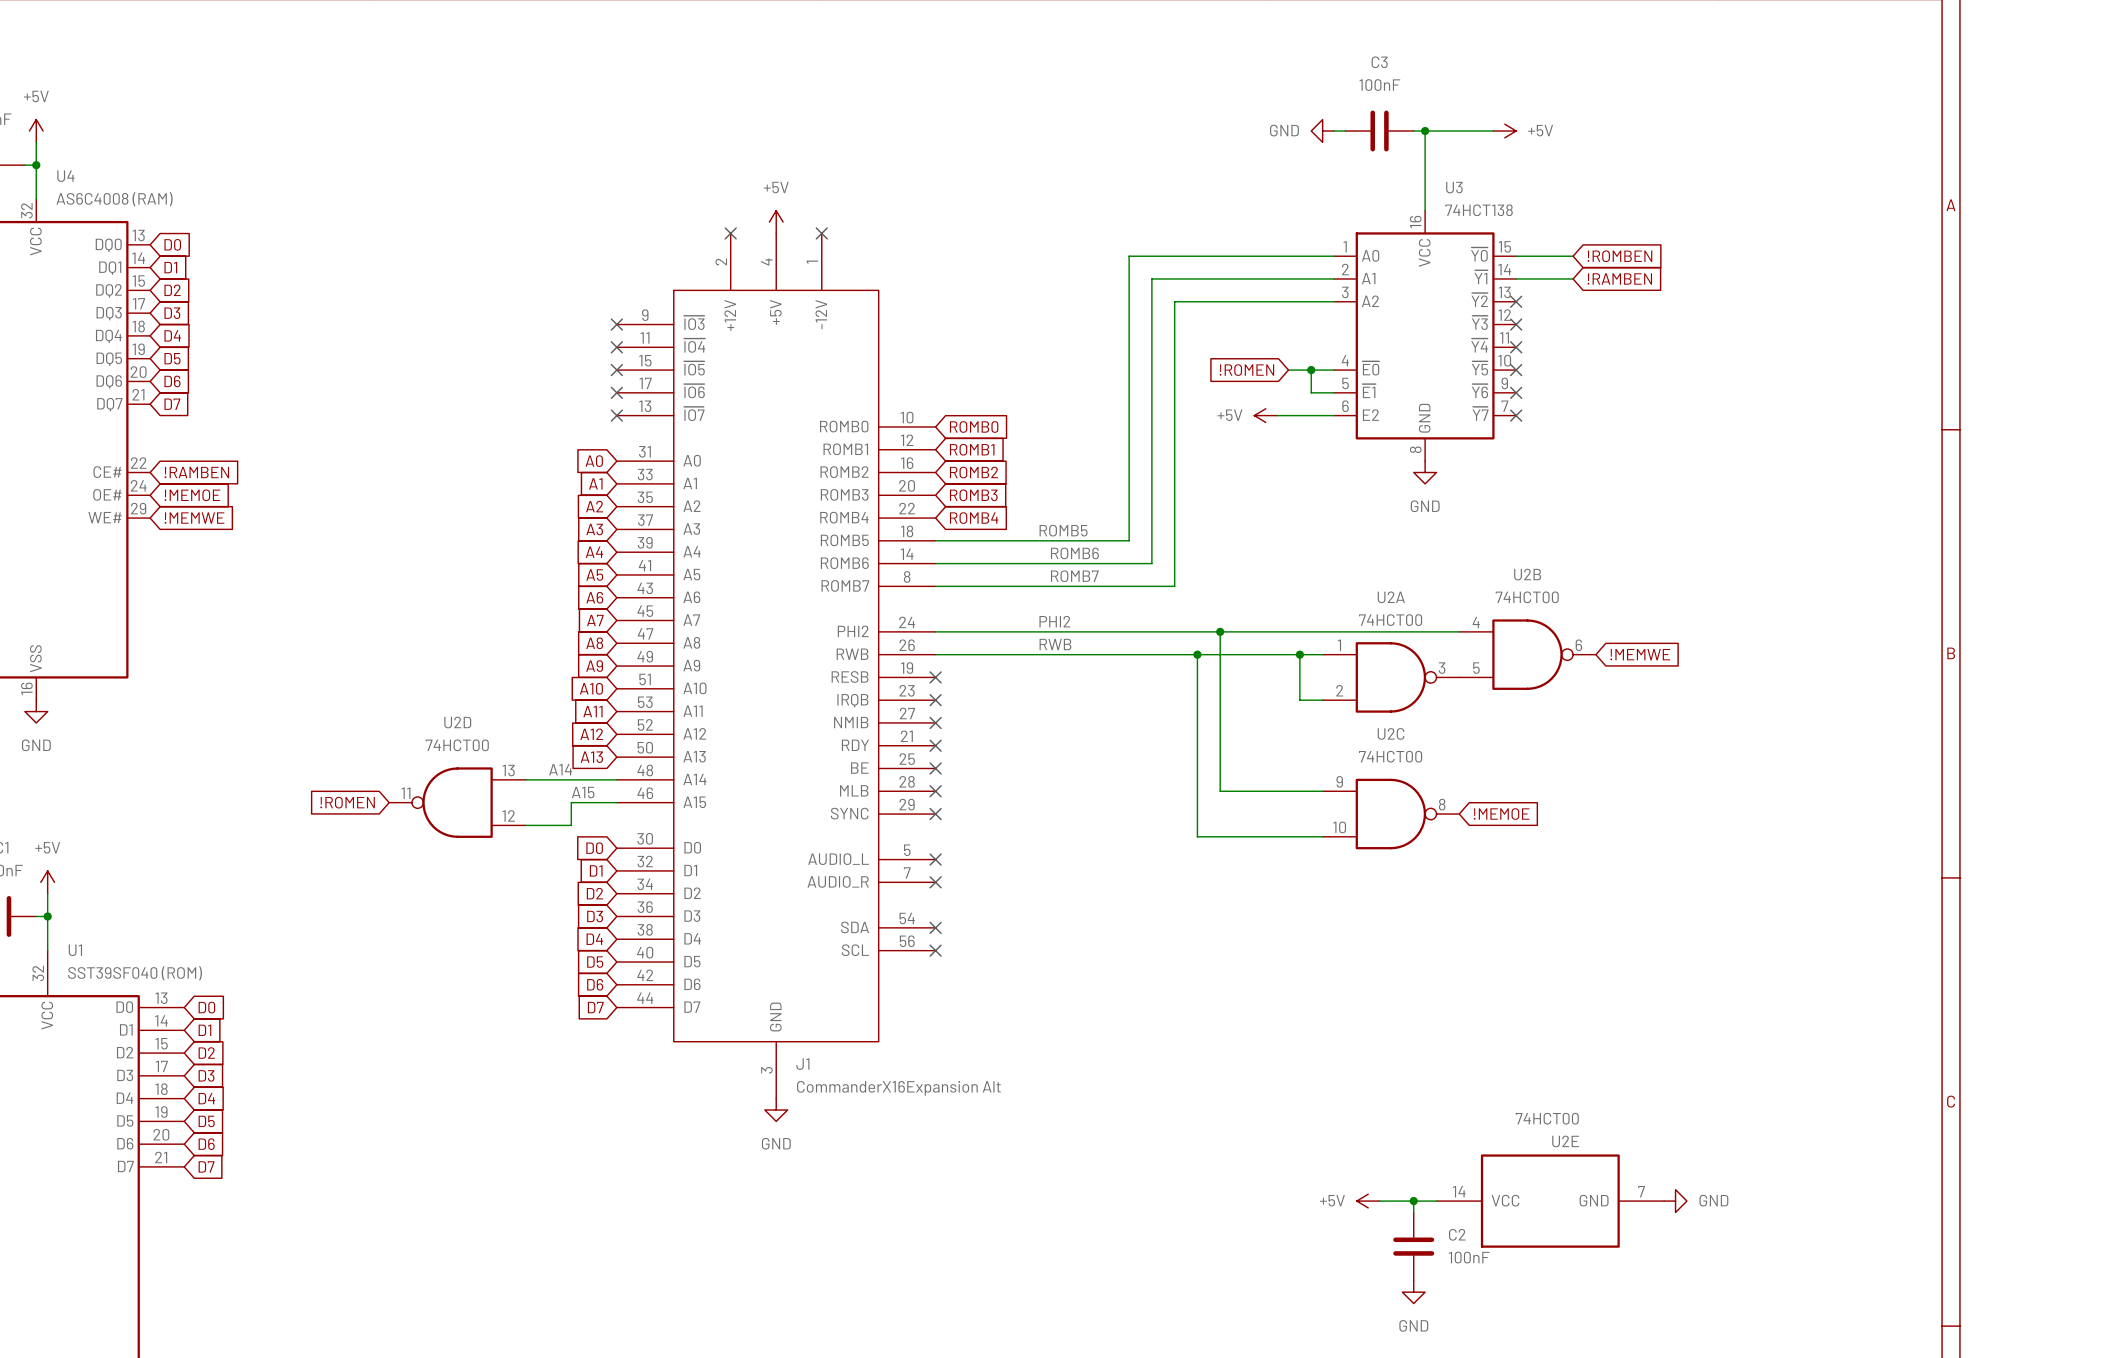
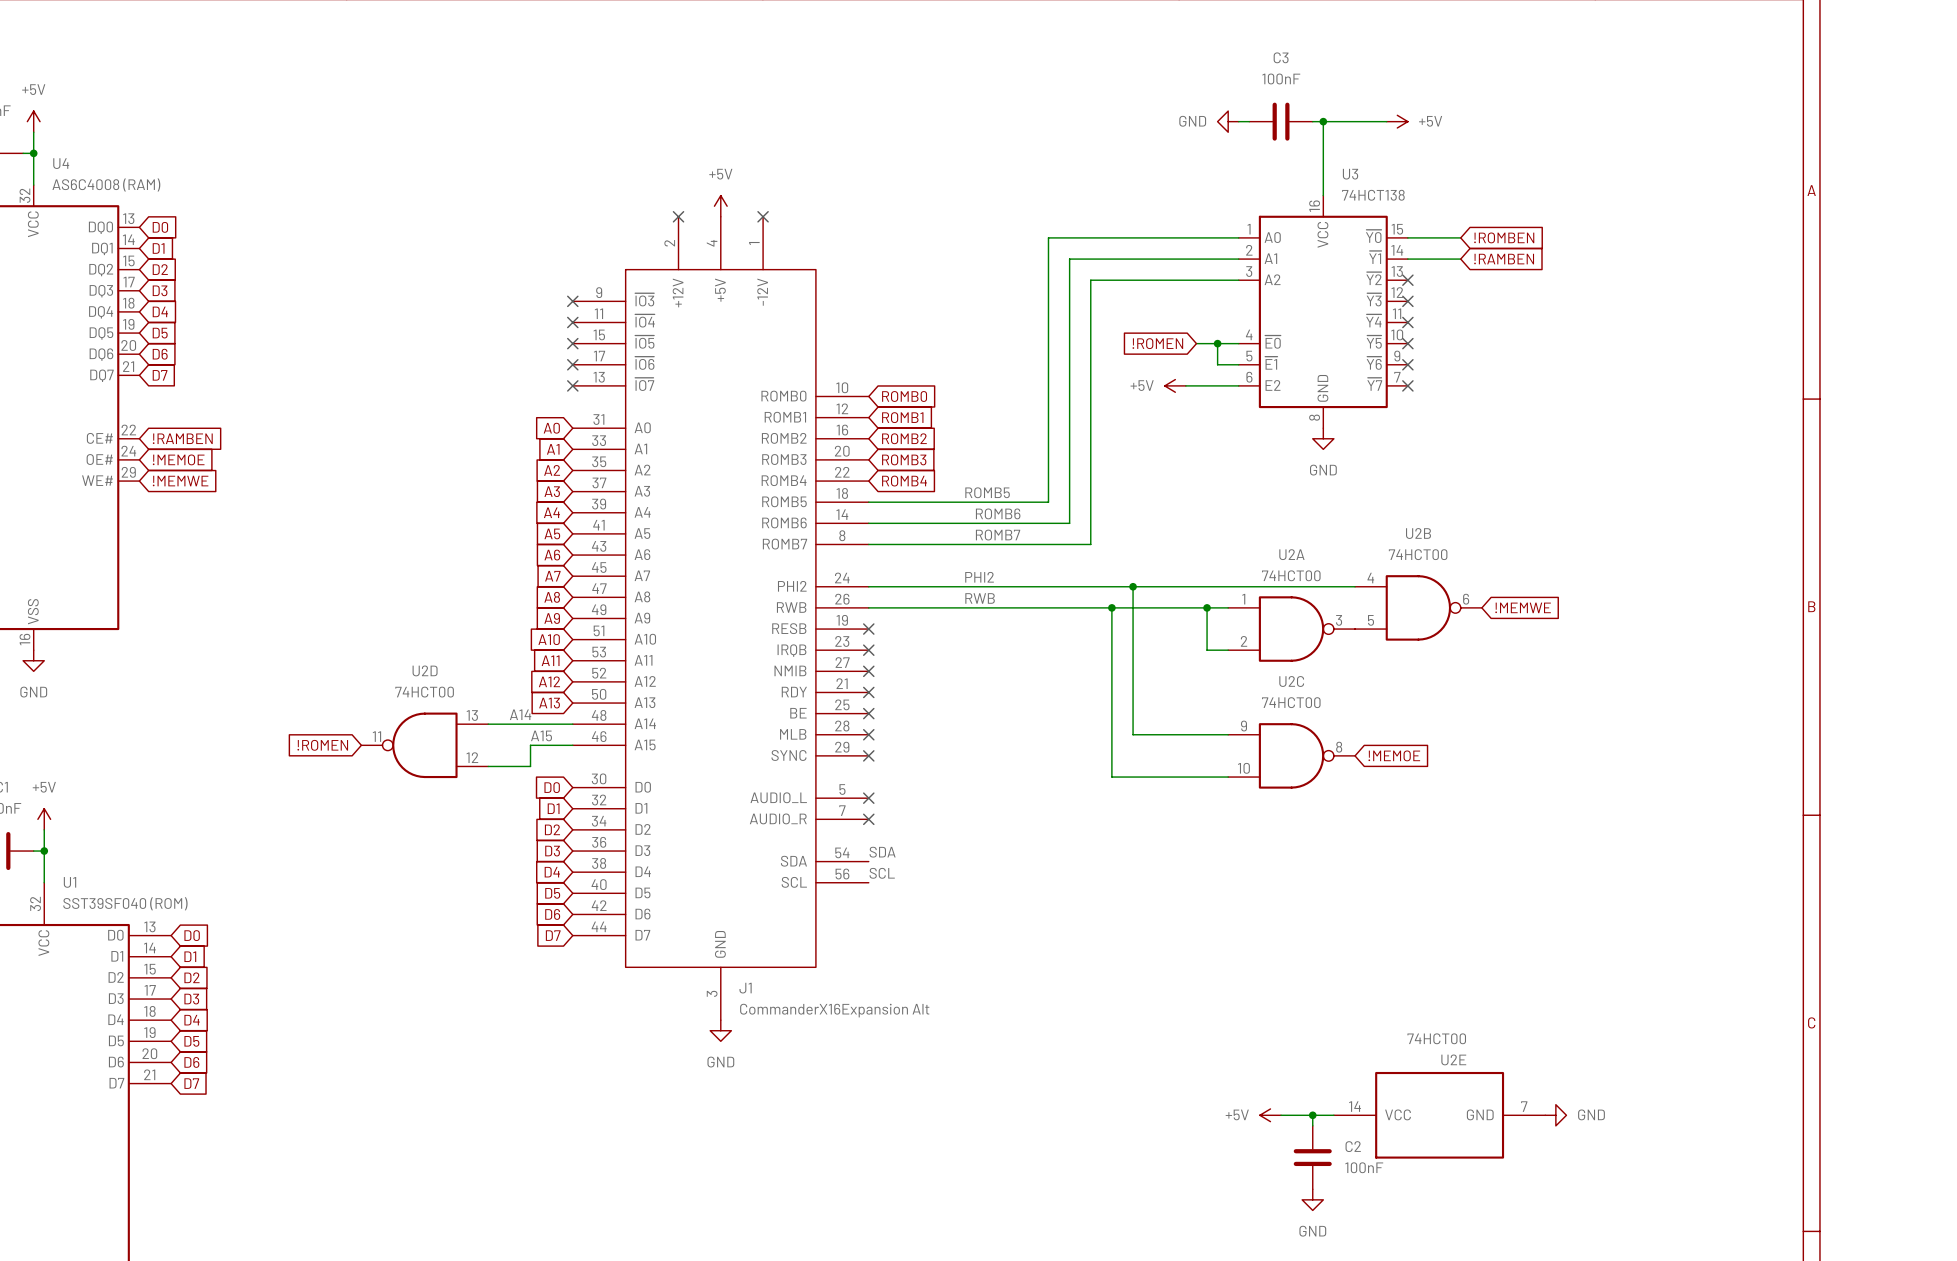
label: none -> SDA (882, 852)
no-connect mark: (935, 927) -> none
label: none -> SCL (882, 873)
no-connect mark: (935, 950) -> none

